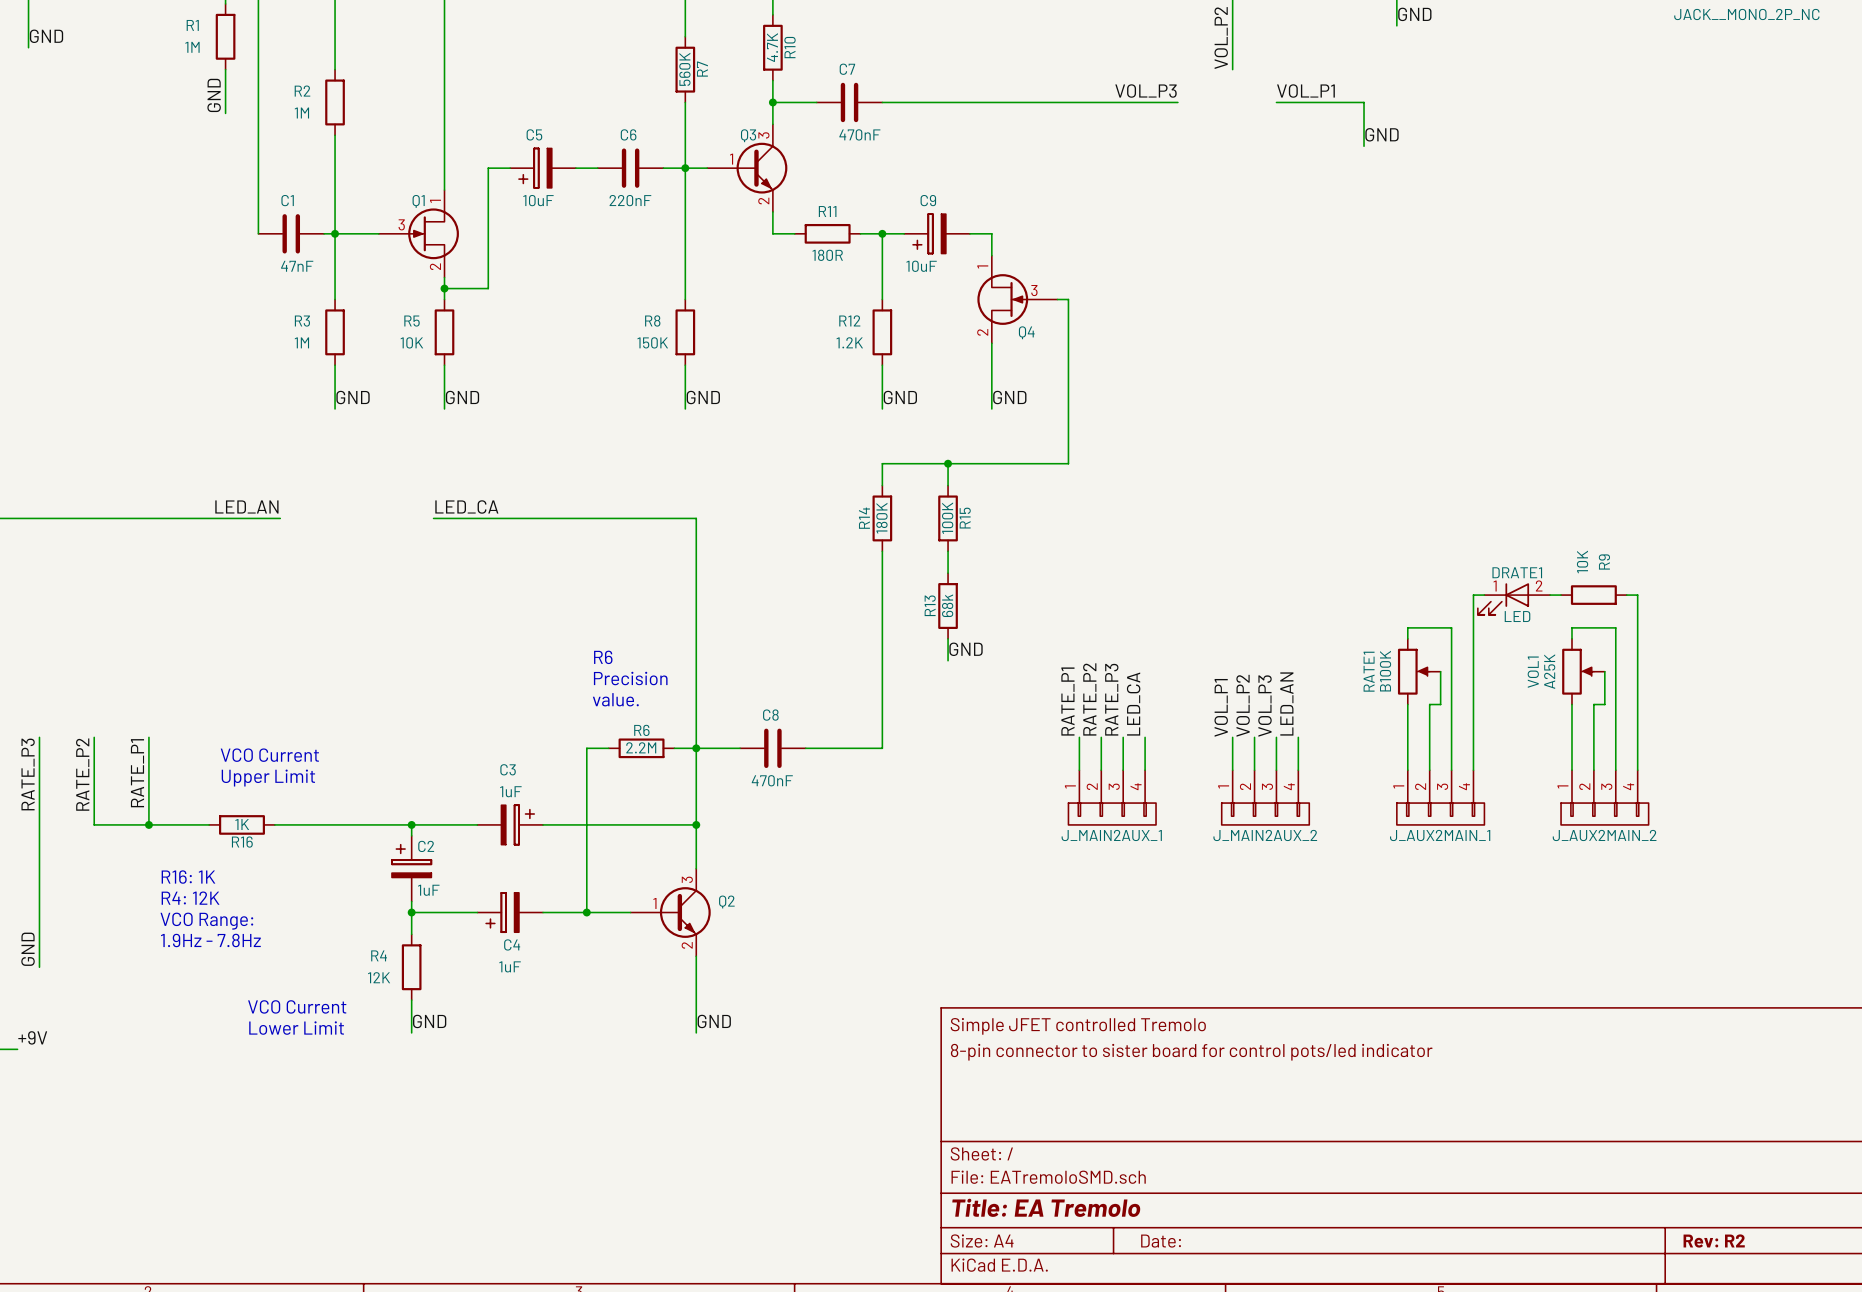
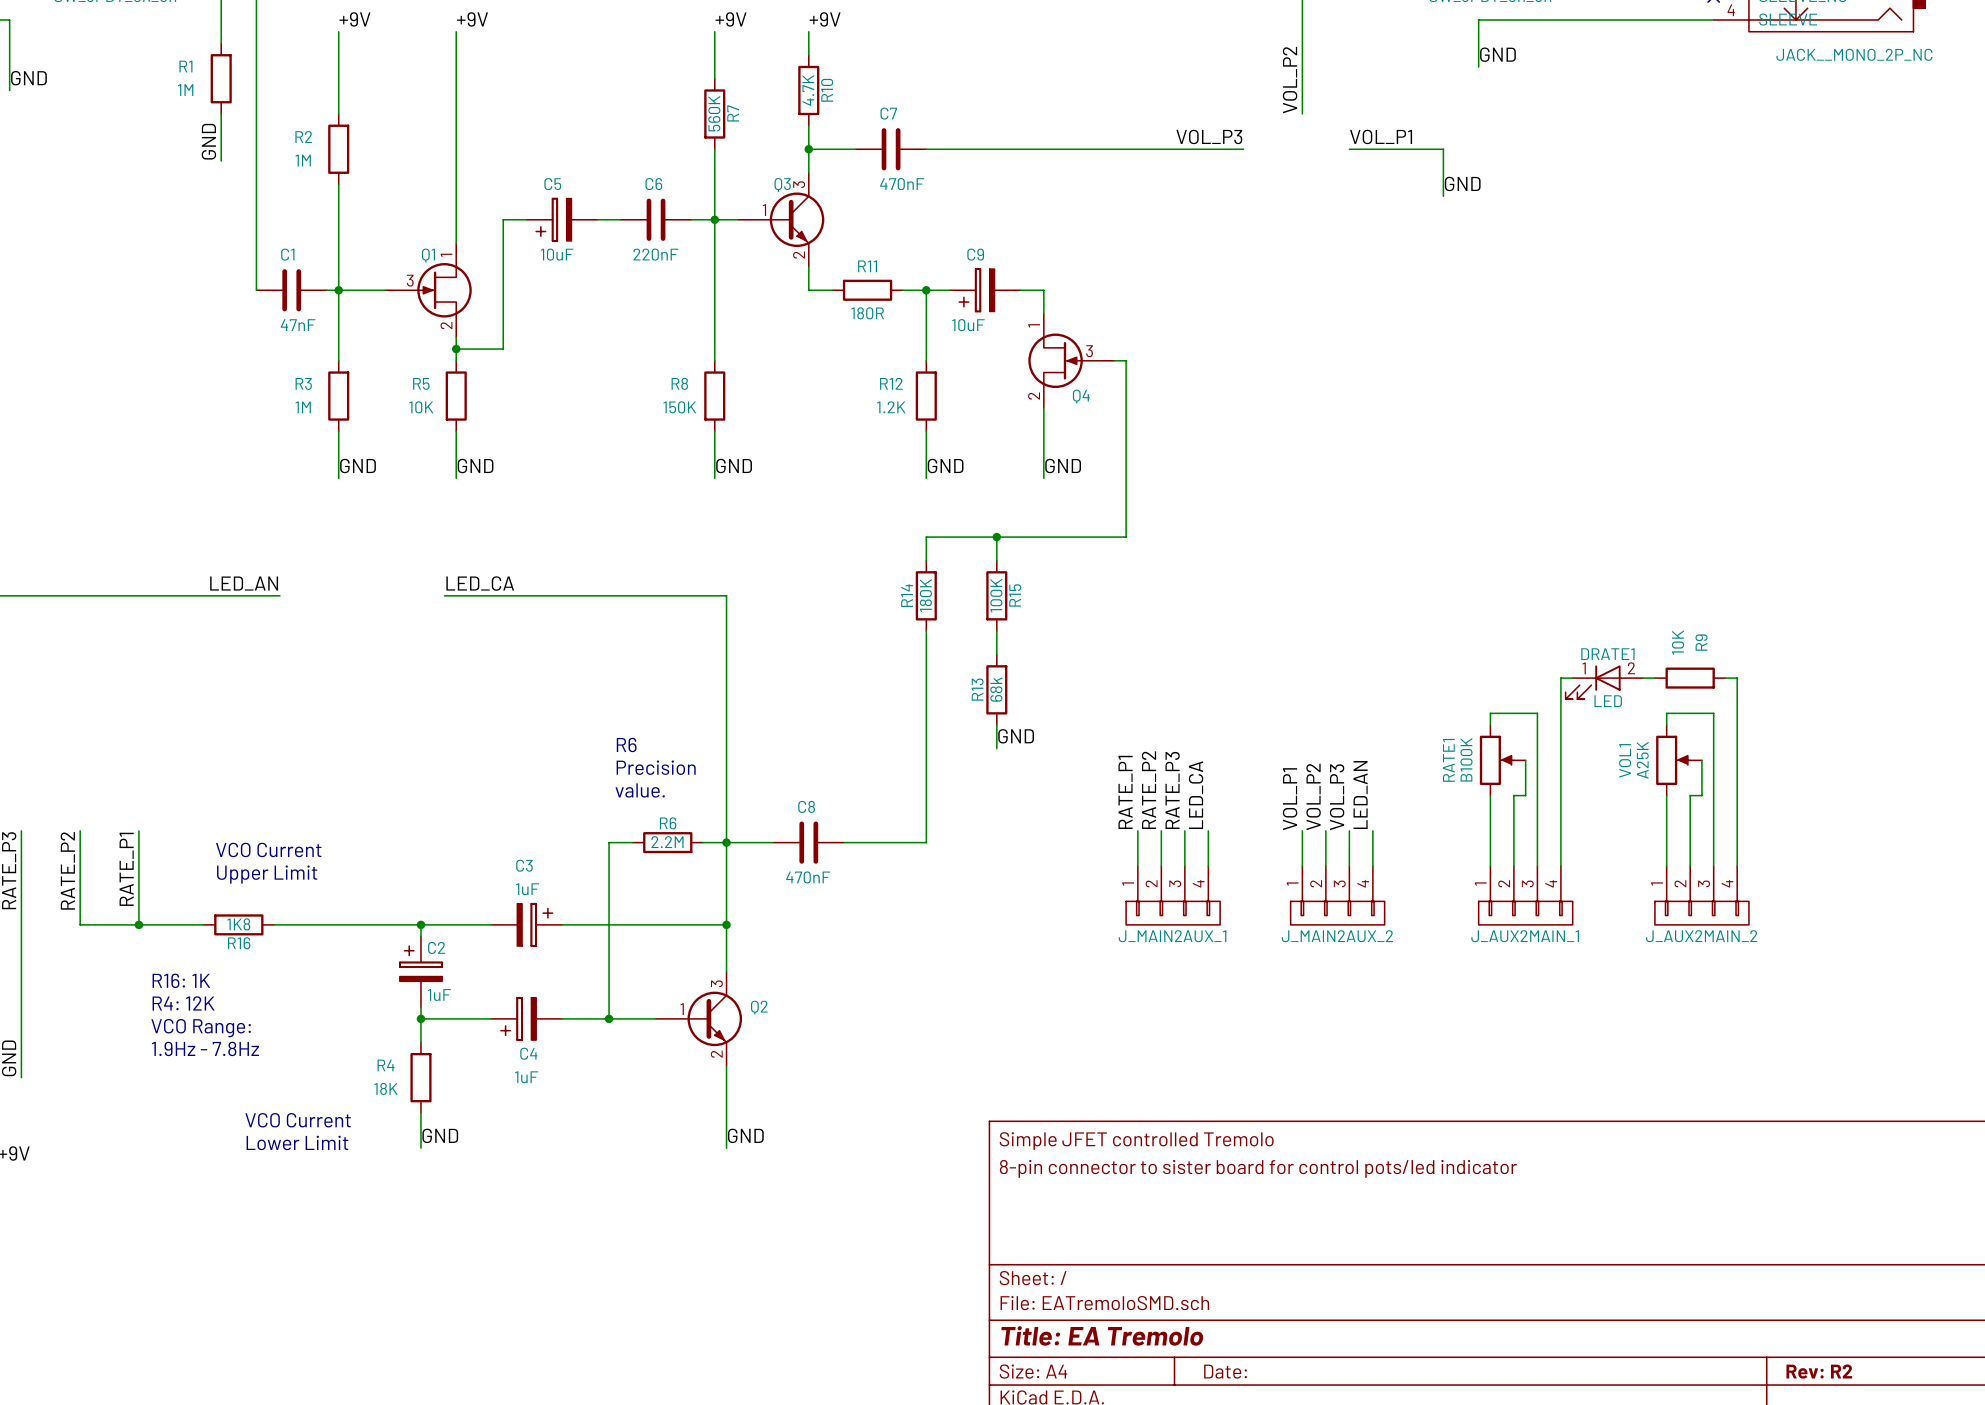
R16 value: 1K (242, 824) -> 1K8 (238, 924)
R4 value: 12K (379, 977) -> 18K (385, 1088)

